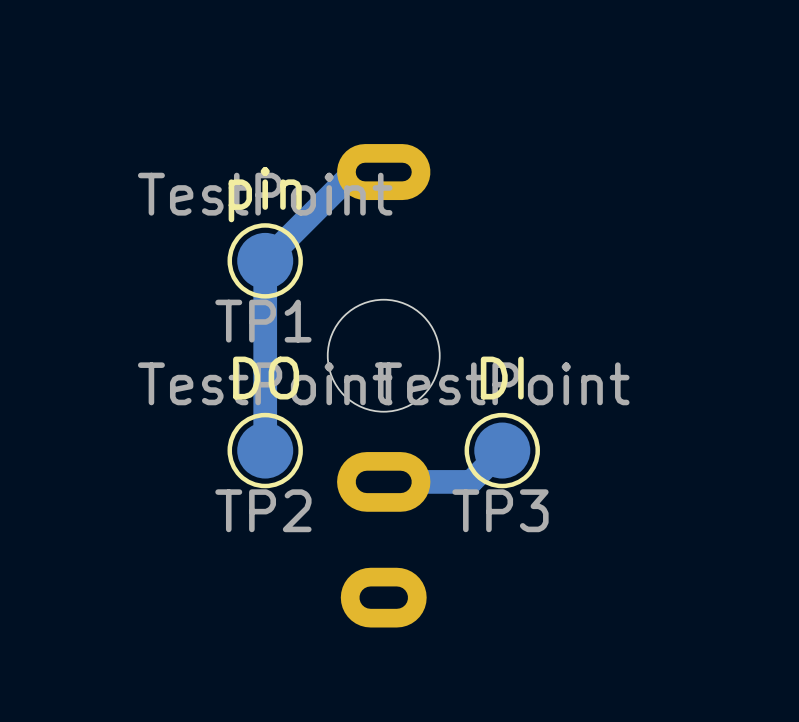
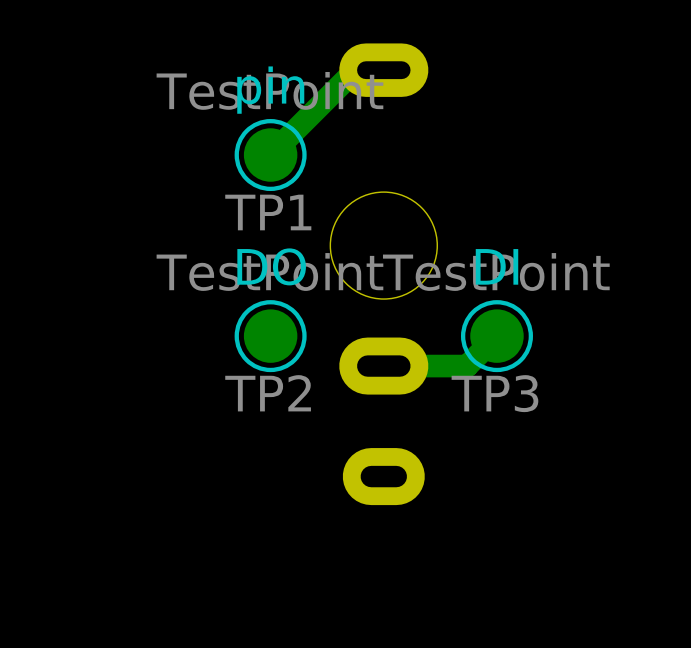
bottom track: (265, 260) (265, 450) -> none

